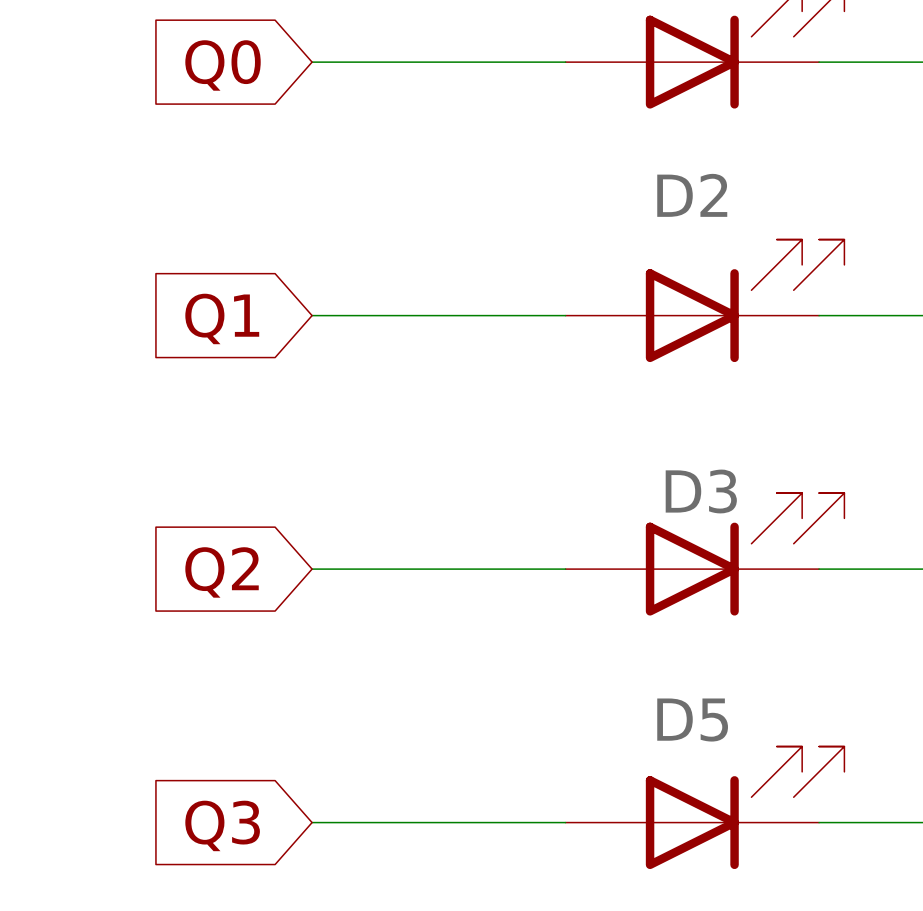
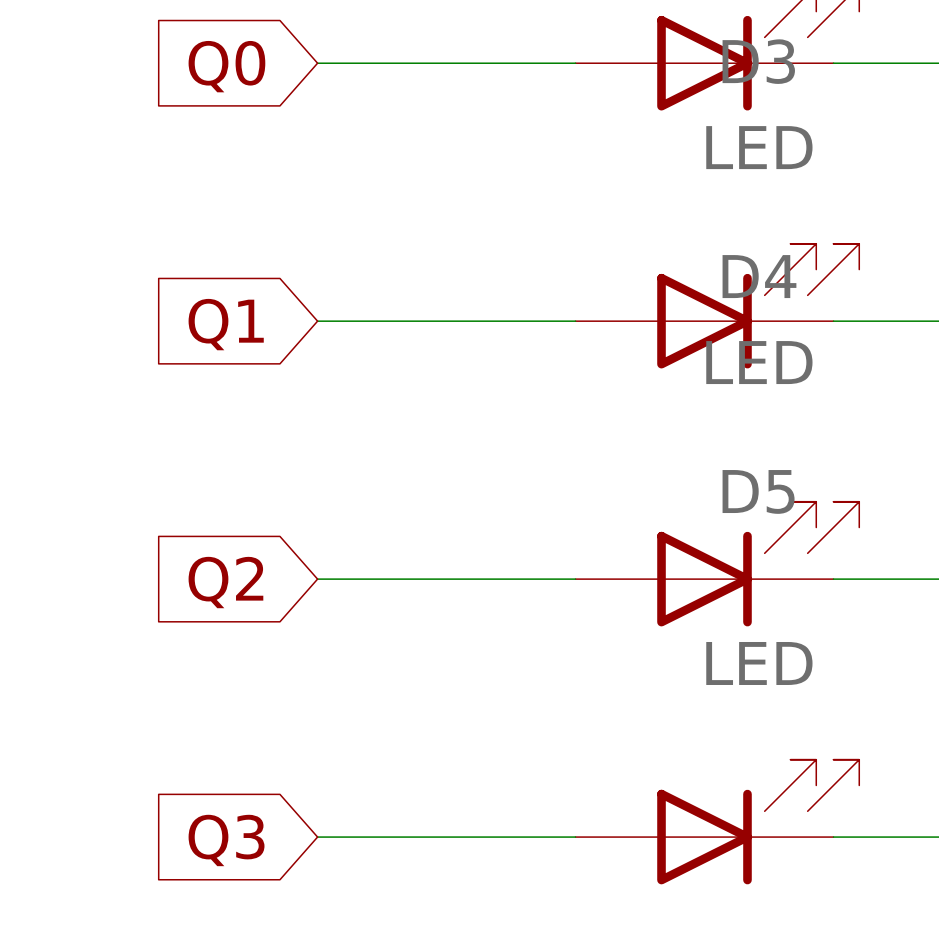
D2 value: none -> LED (759, 147)
D2 name: D2 (692, 195) -> D3 (758, 61)
D3 value: none -> LED (759, 362)
D3 name: D3 (701, 491) -> D4 (759, 276)
D5 value: none -> LED (759, 663)
D5 name position: D5 (692, 720) -> D5 (758, 491)

